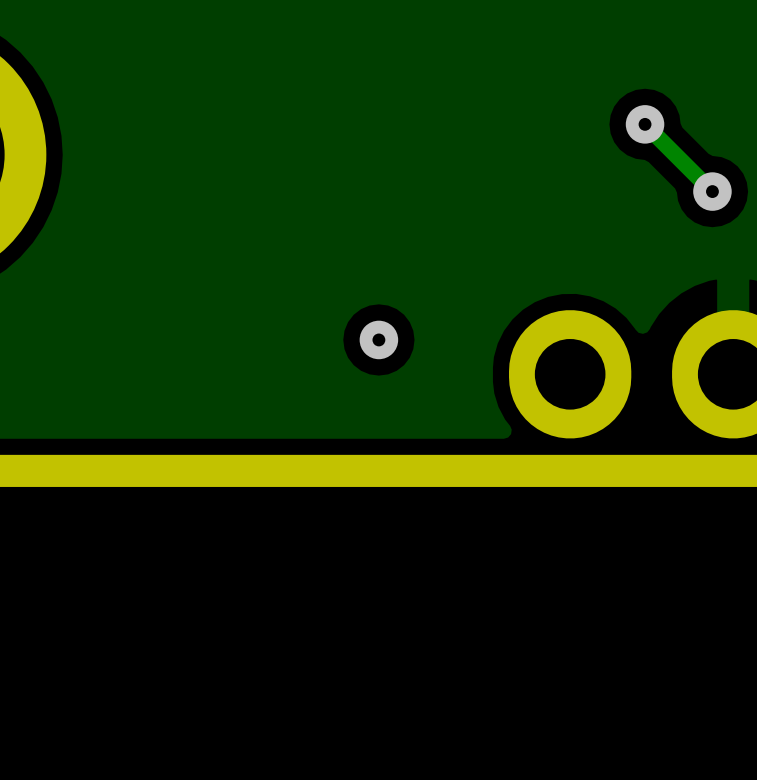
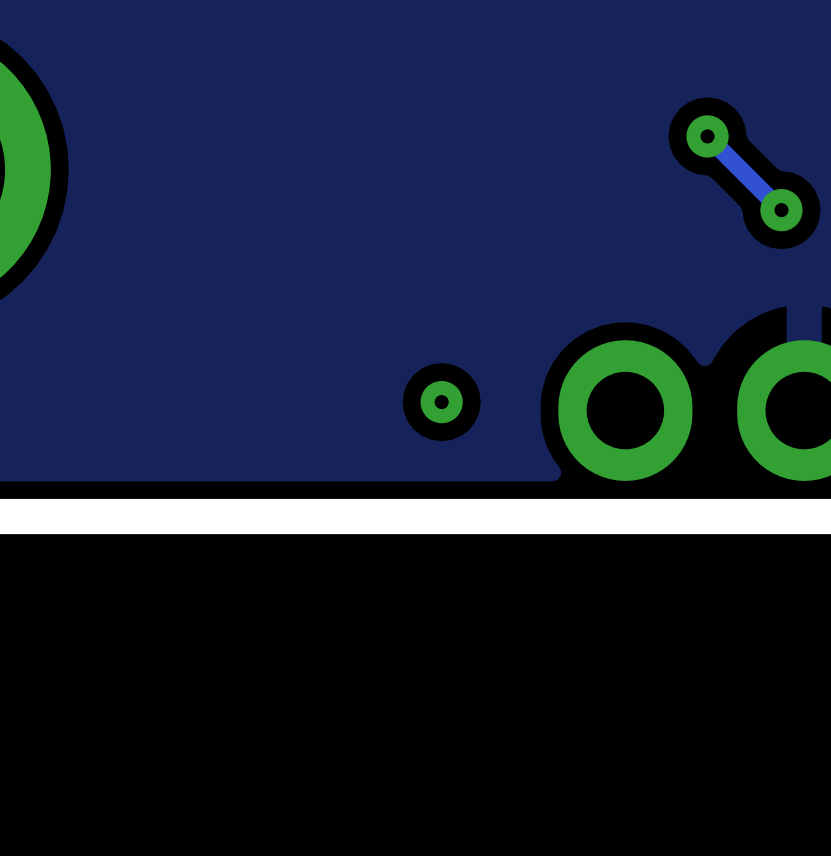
via position: (378, 339) -> (441, 402)

